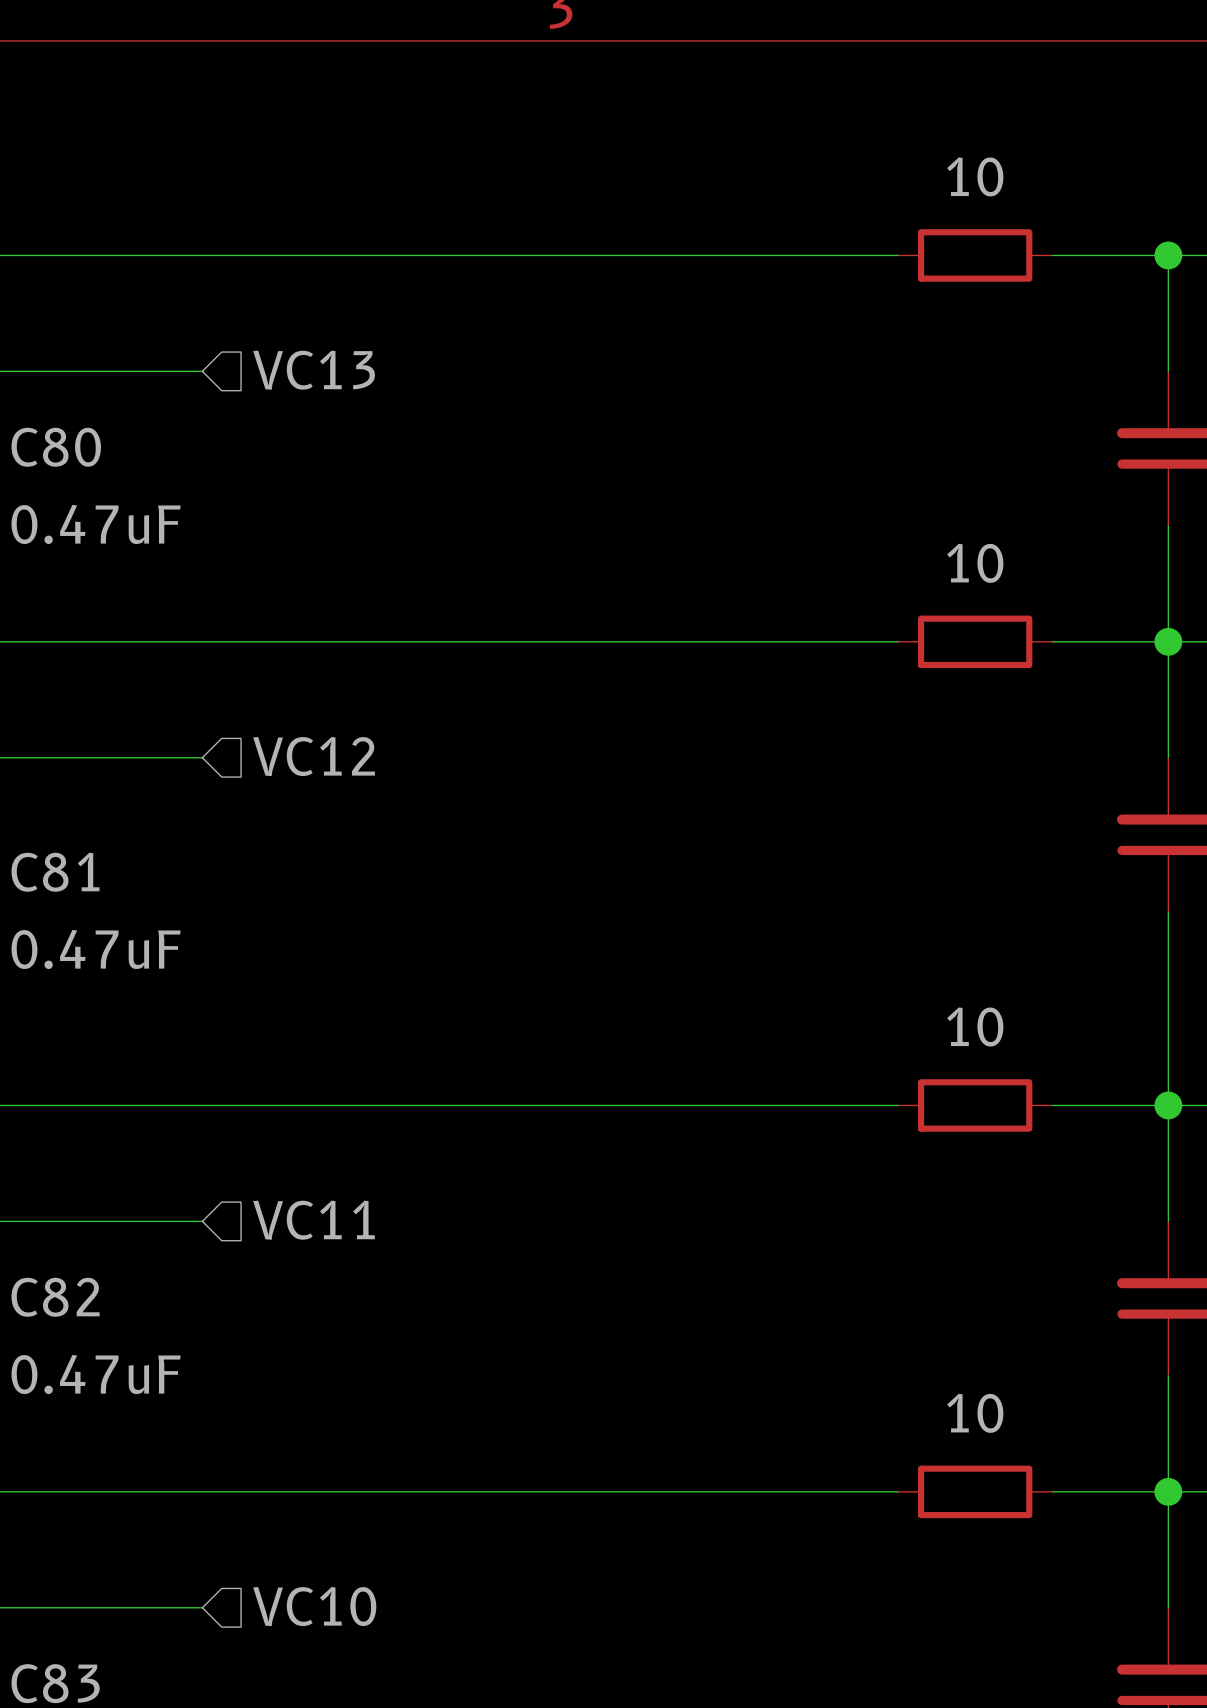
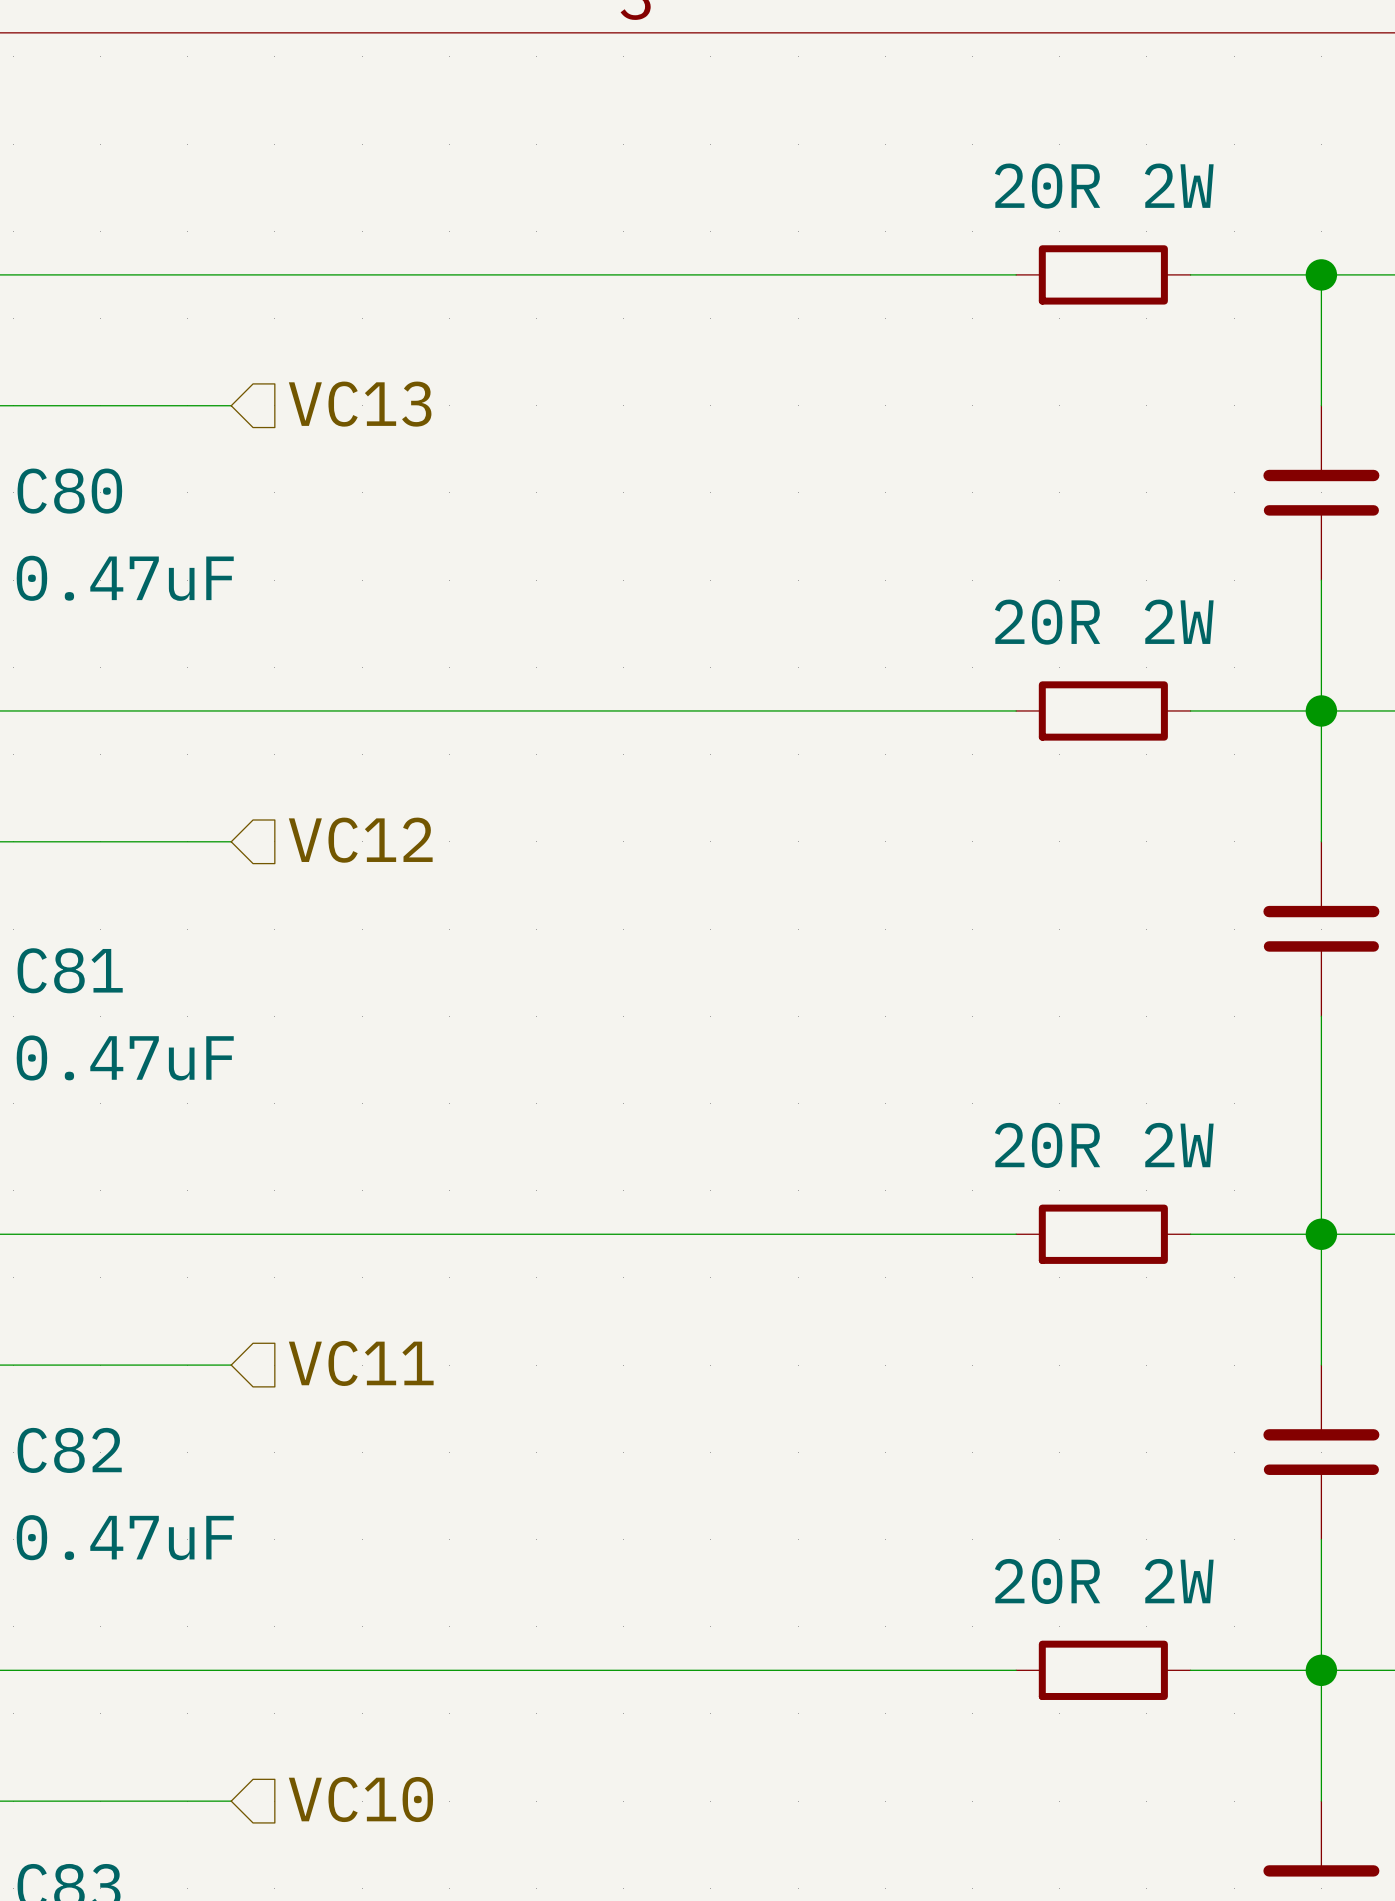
part value: 10 (975, 176) -> 20R 2W (1104, 186)
part value: 10 (975, 563) -> 20R 2W (1104, 622)
part value: 10 (975, 1026) -> 20R 2W (1104, 1145)
part value: 10 (975, 1413) -> 20R 2W (1104, 1581)

